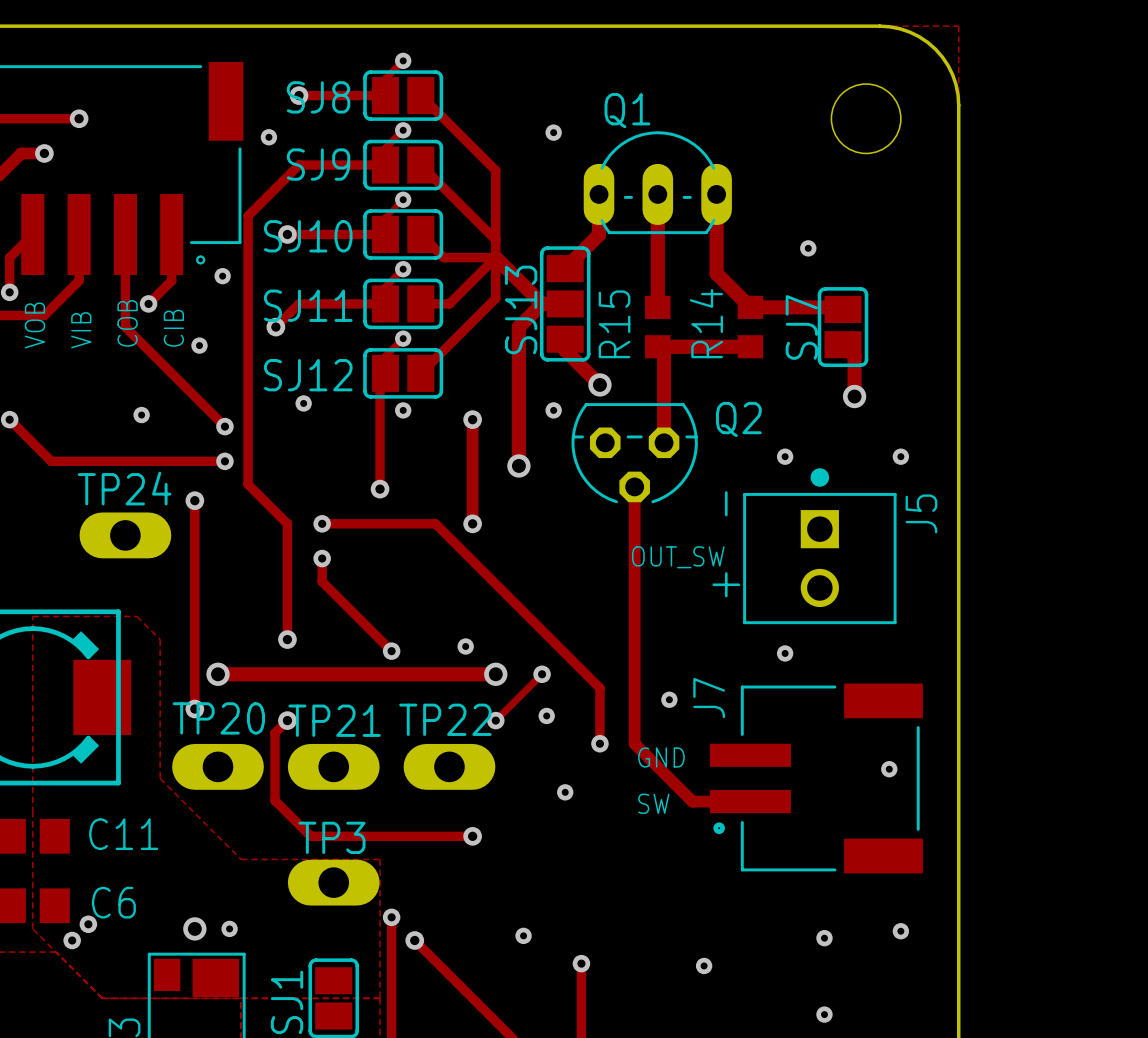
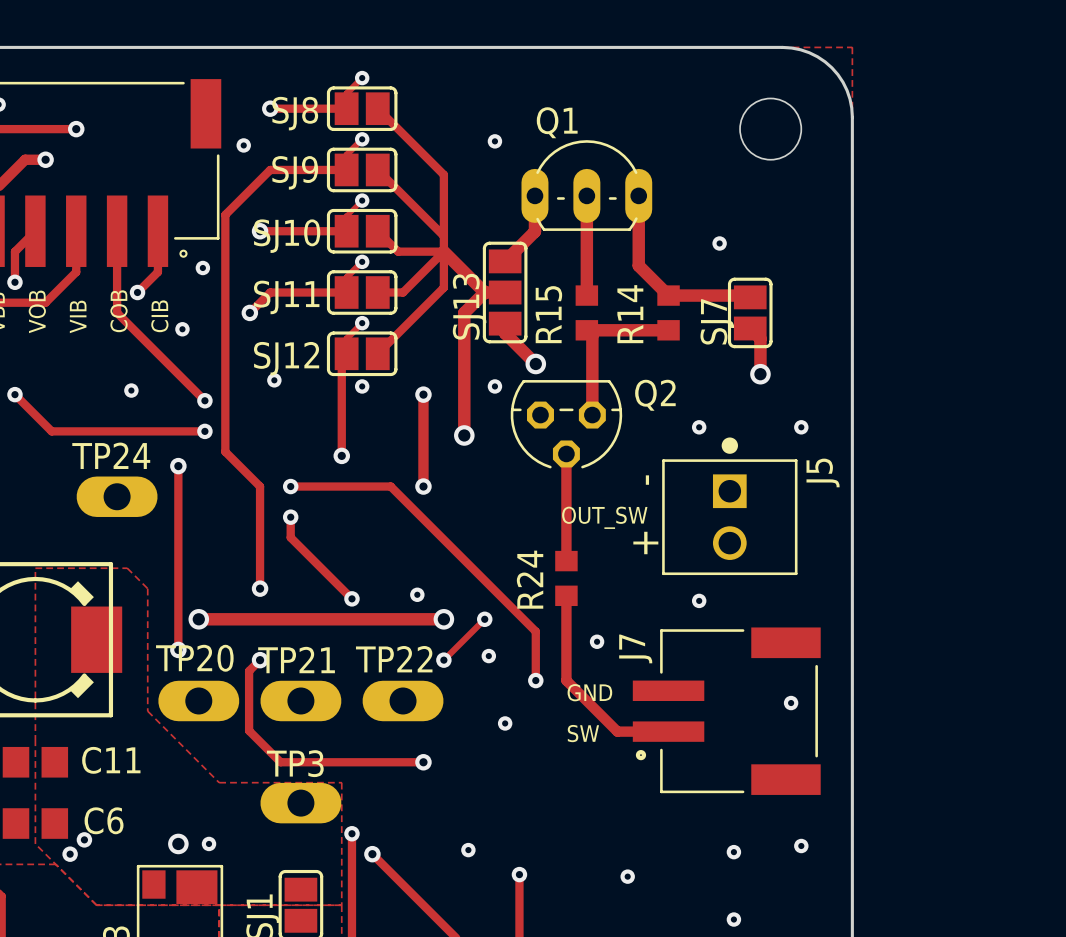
track: (634, 608) (634, 647) -> none
R24: none -> (566, 578)

